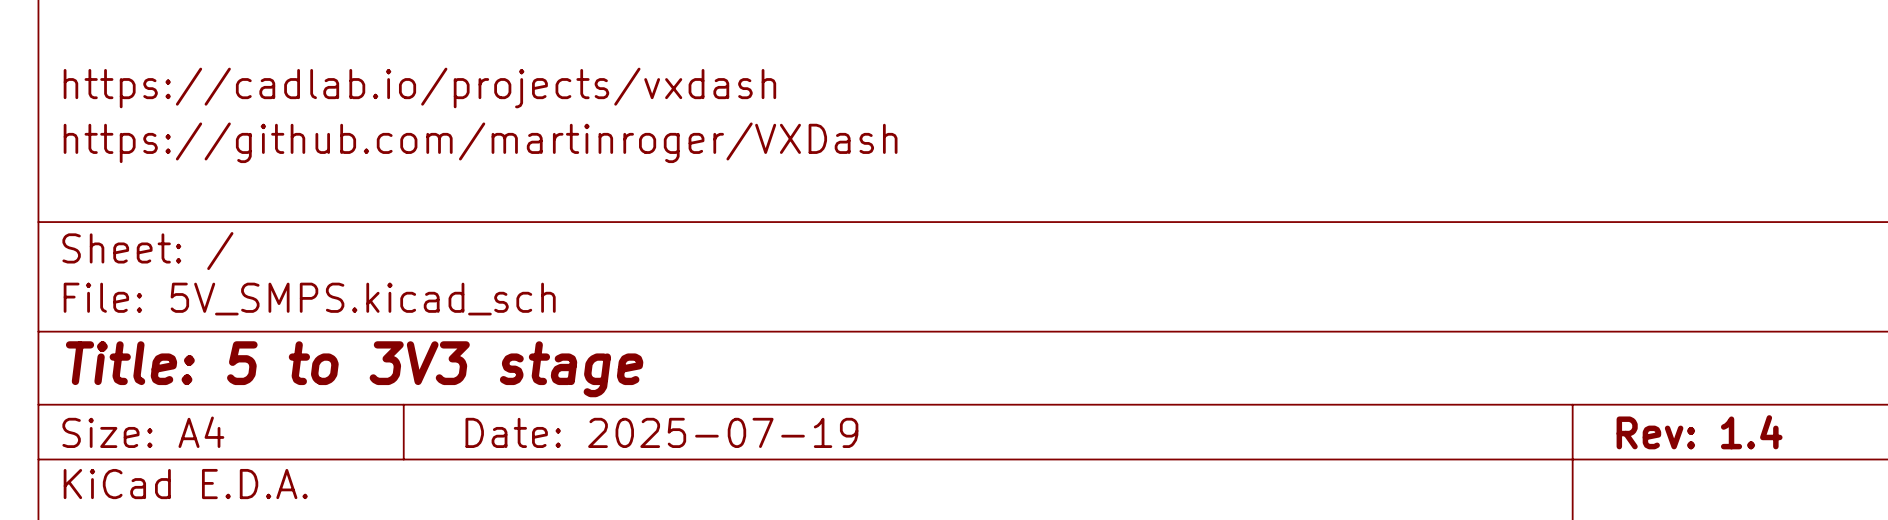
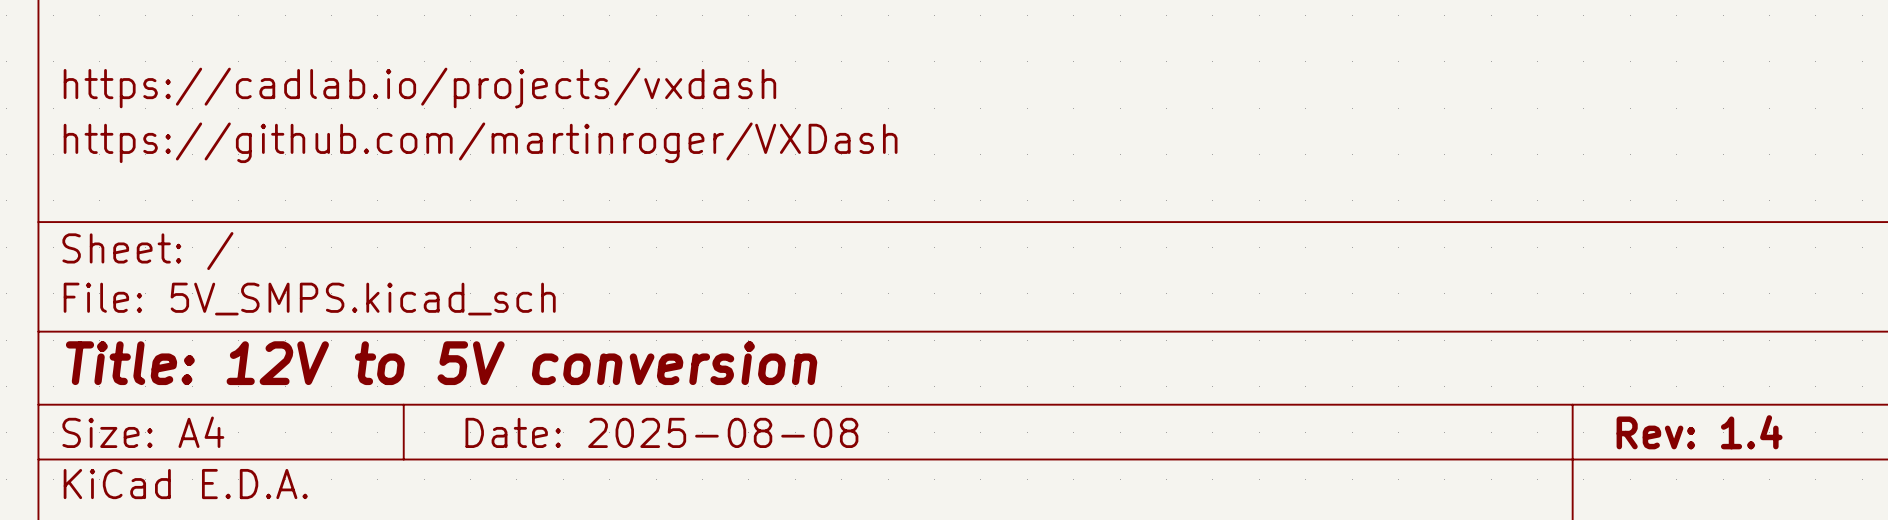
title block: Title: 5 to 3V3 stage (354, 369) -> Title: 12V to 5V conversion (441, 363)
title block: Date: 2025-07-19 (661, 432) -> Date: 2025-08-08 (661, 432)

